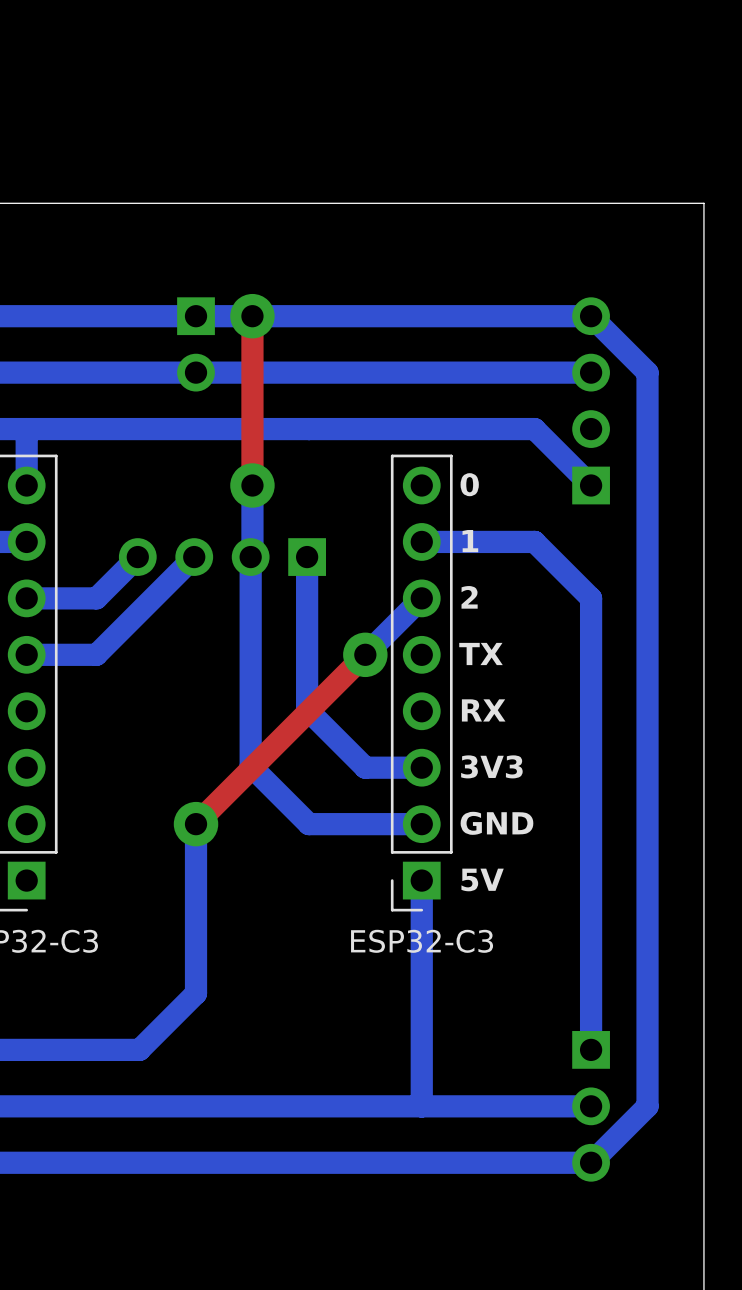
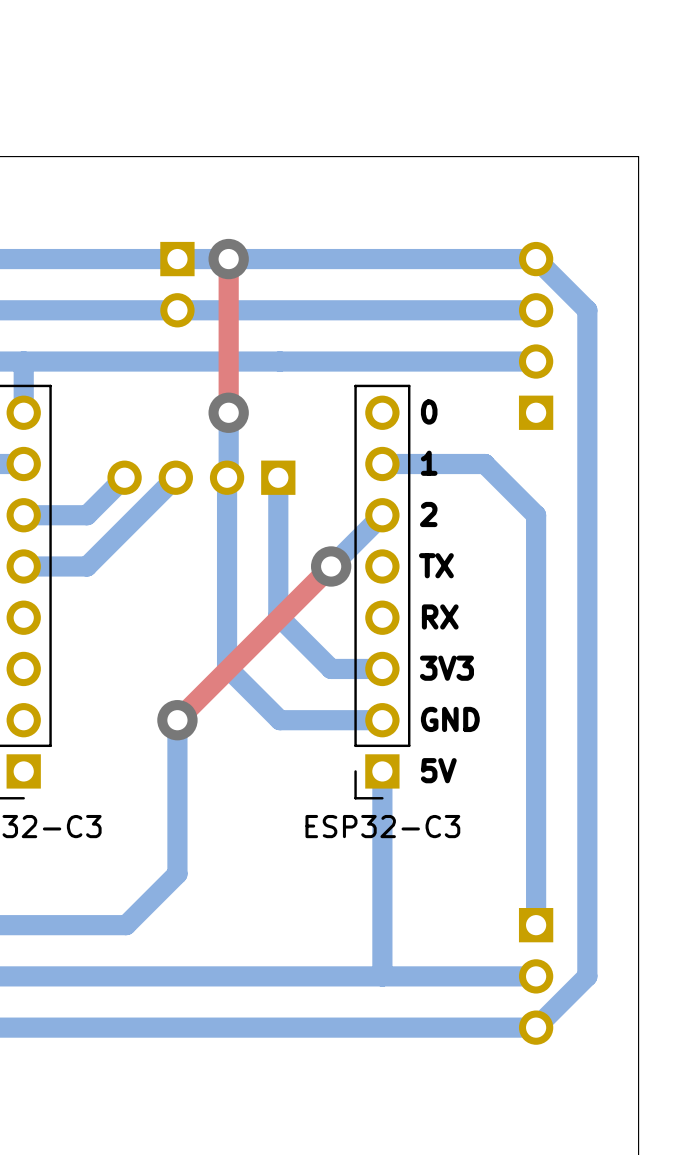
bottom track: (534, 429) (591, 485) -> (484, 361) (536, 361)

